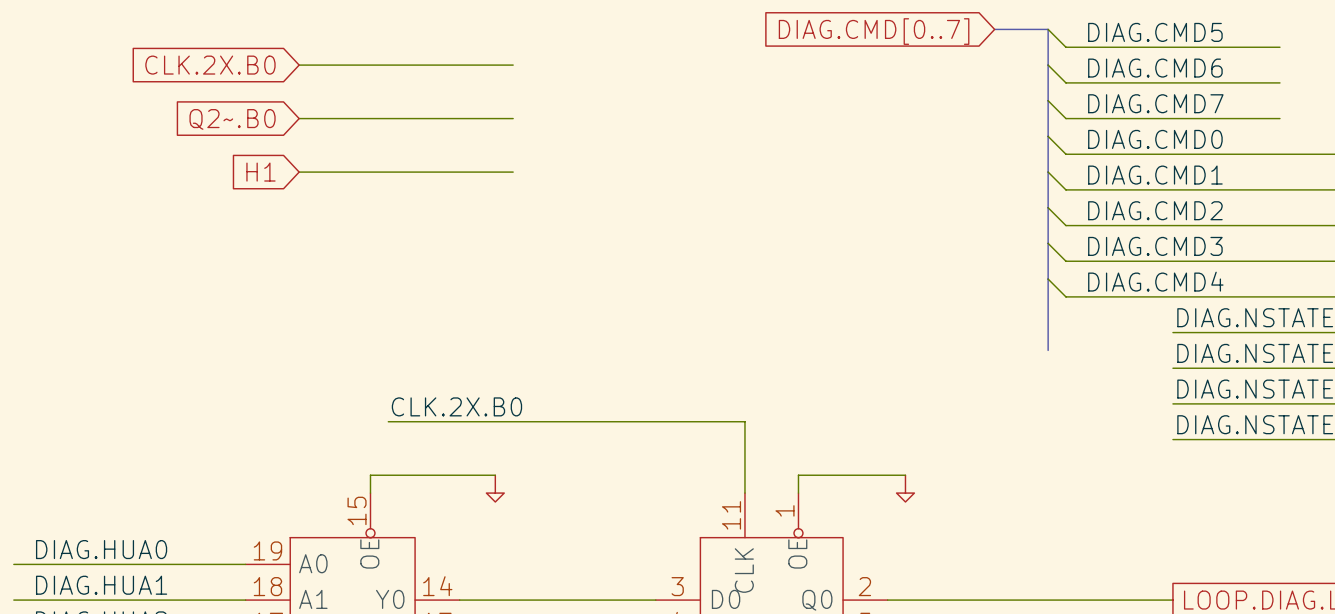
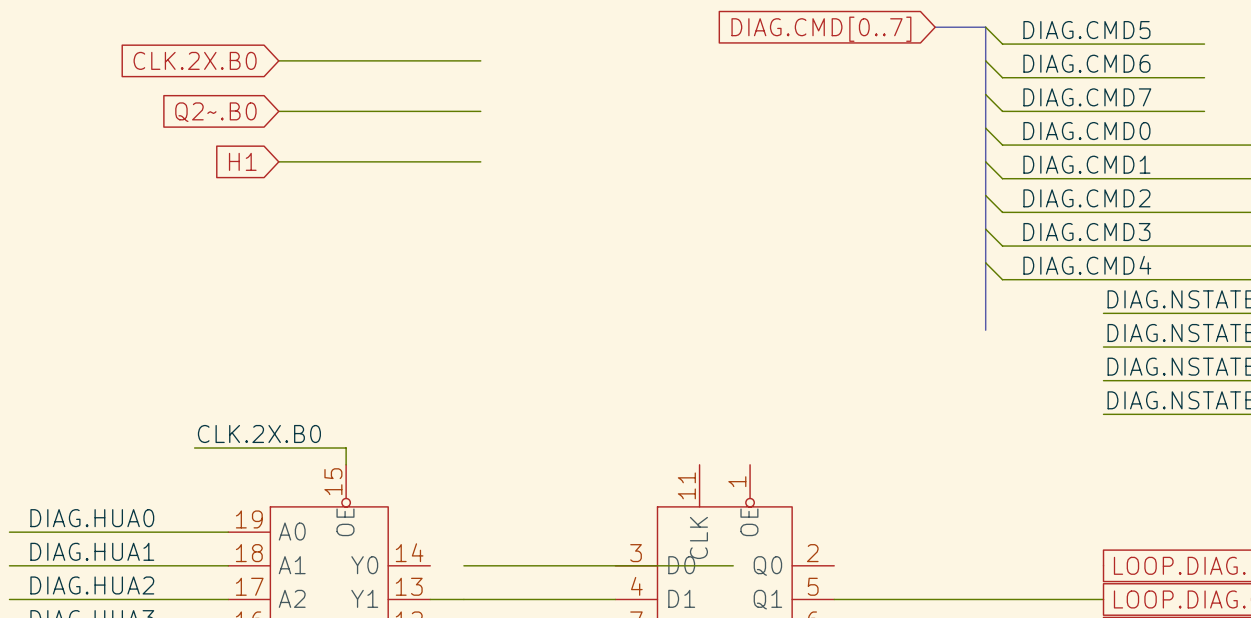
label: CLK.2X.B0 (456, 406) -> none
wire: (388, 421) (744, 421) (744, 493) -> none
label: none -> CLK.2X.B0 (259, 433)
wire: (370, 475) (495, 475) -> (346, 448) (194, 448)
wire: (905, 475) (798, 475) (798, 493) -> none
power symbol: (495, 488) -> none
power symbol: (905, 488) -> none
wire: (459, 600) (495, 600) -> none
wire: none -> (615, 565) (733, 565)
wire: (887, 600) (1172, 600) -> none

